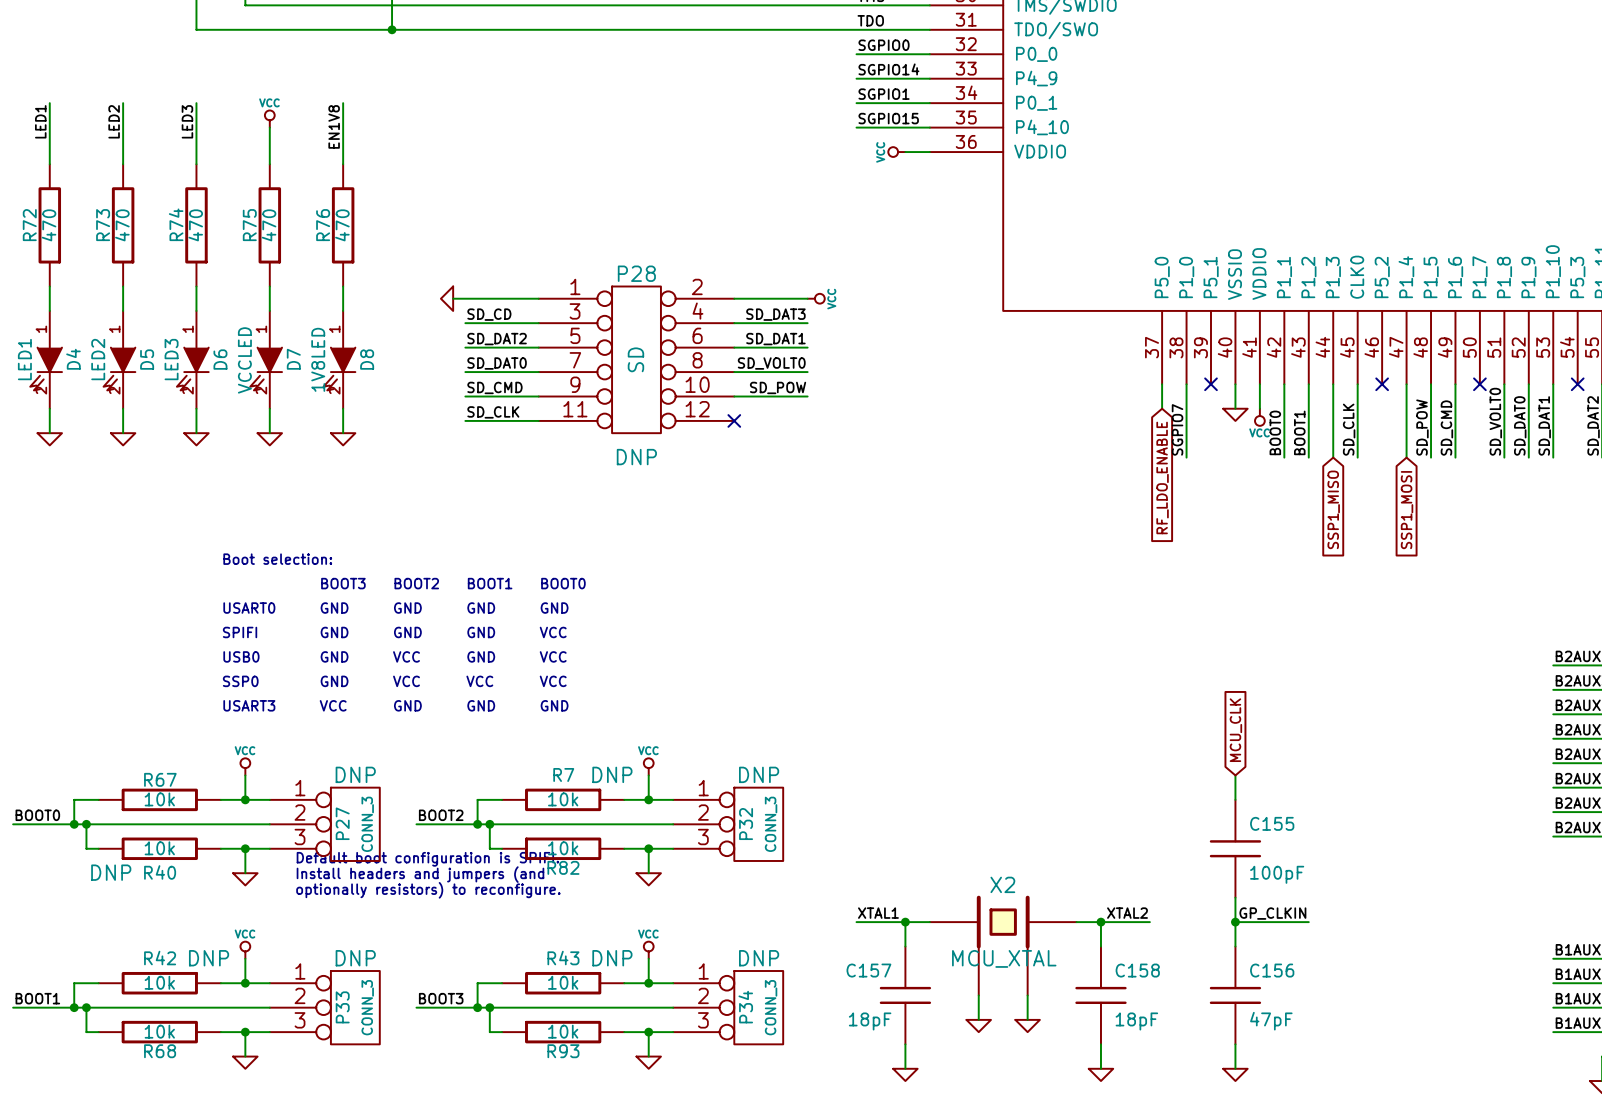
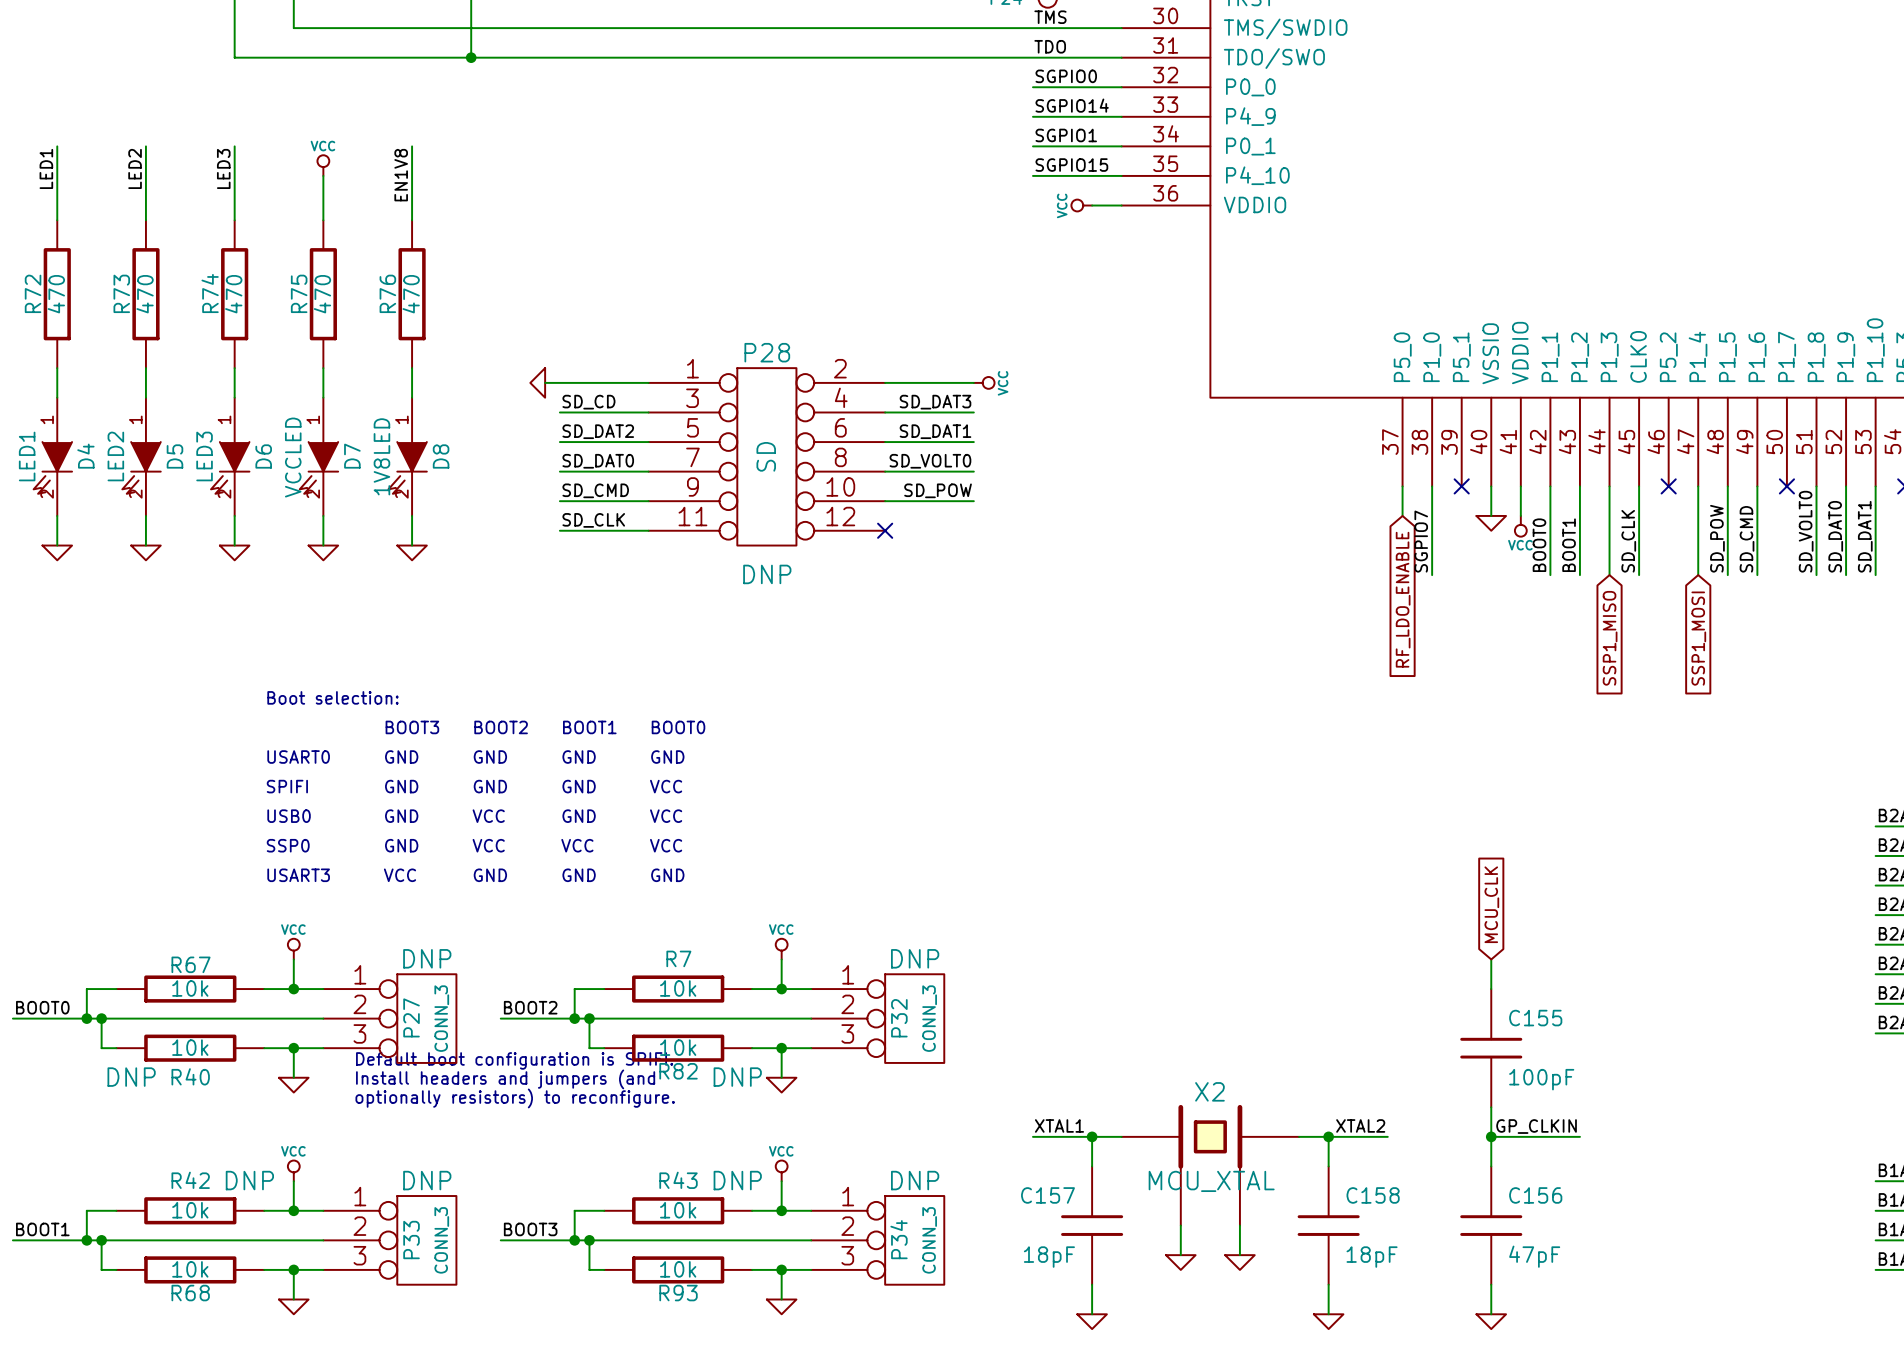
R7 text: DNP (612, 774) -> none
R82 text: none -> DNP (737, 1077)

